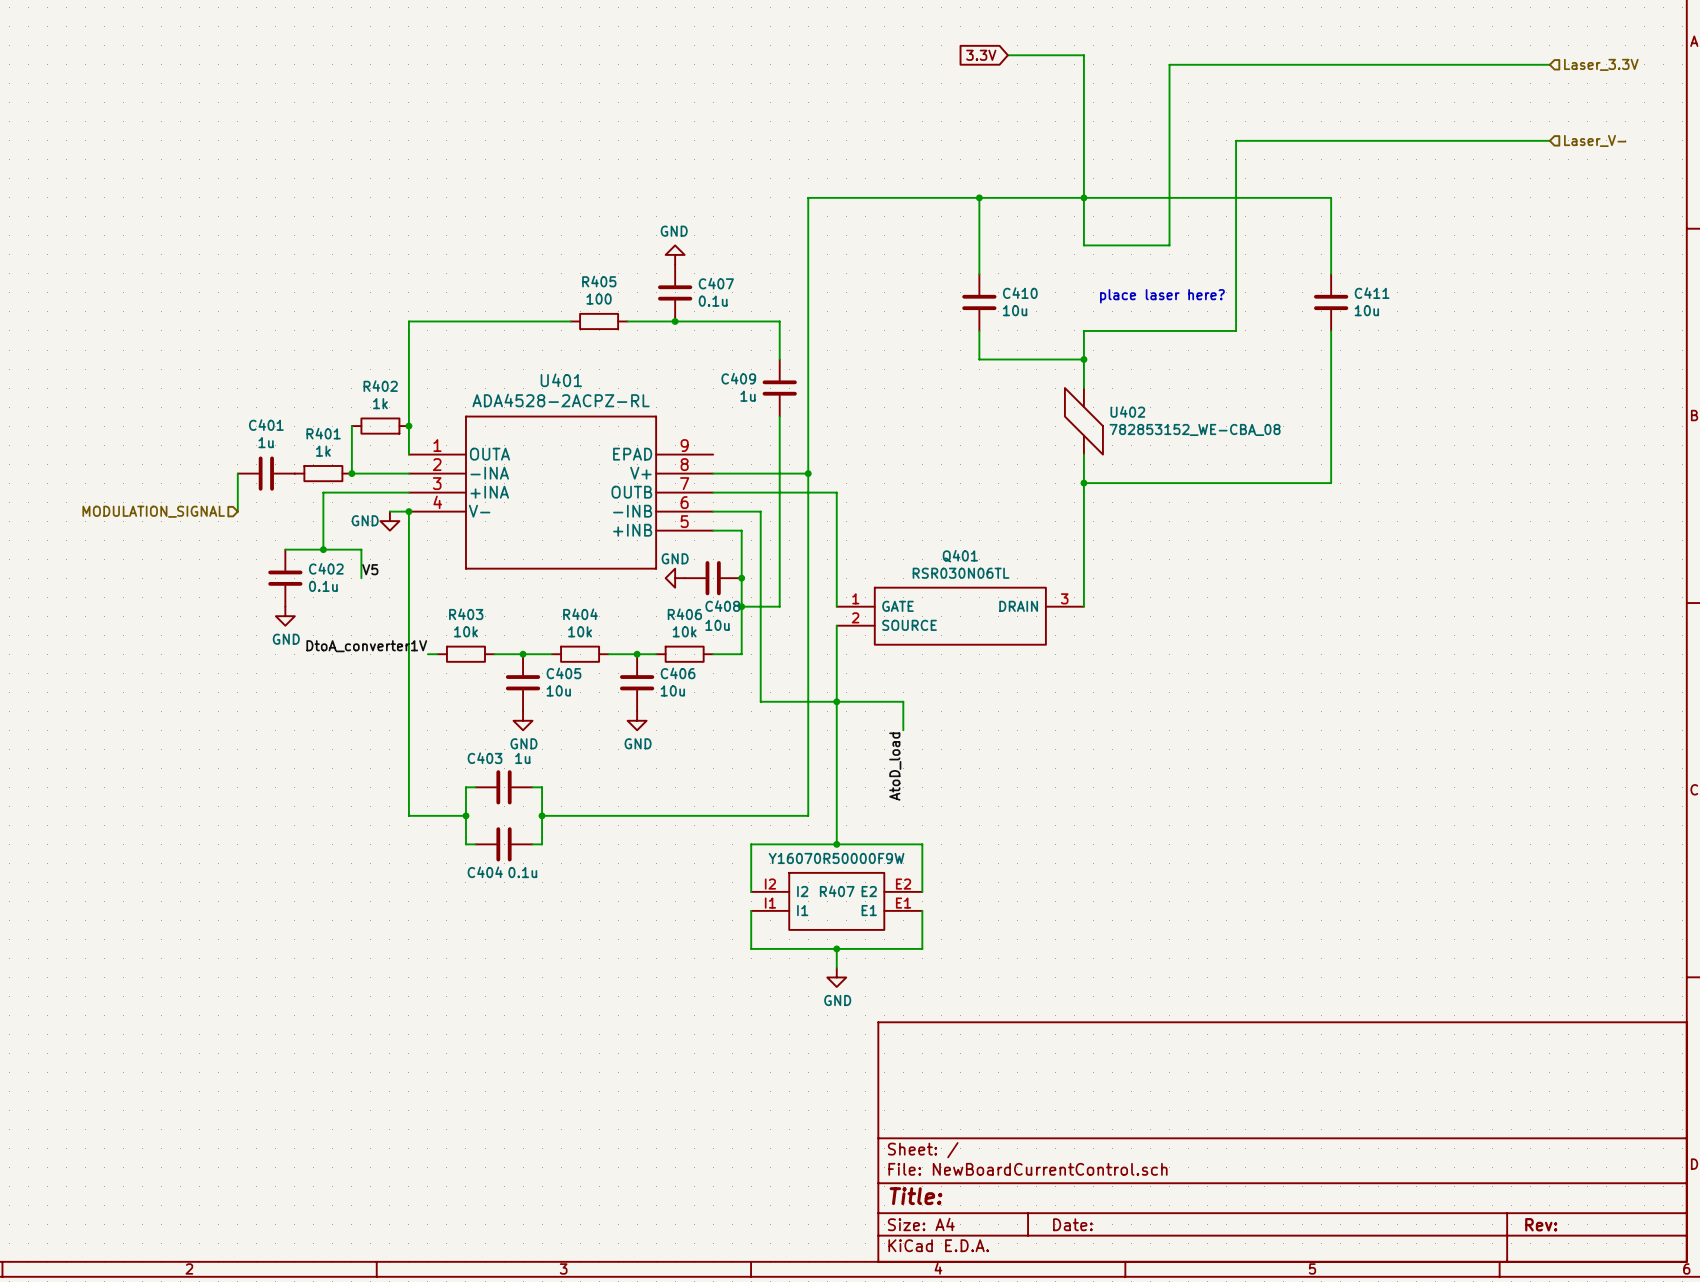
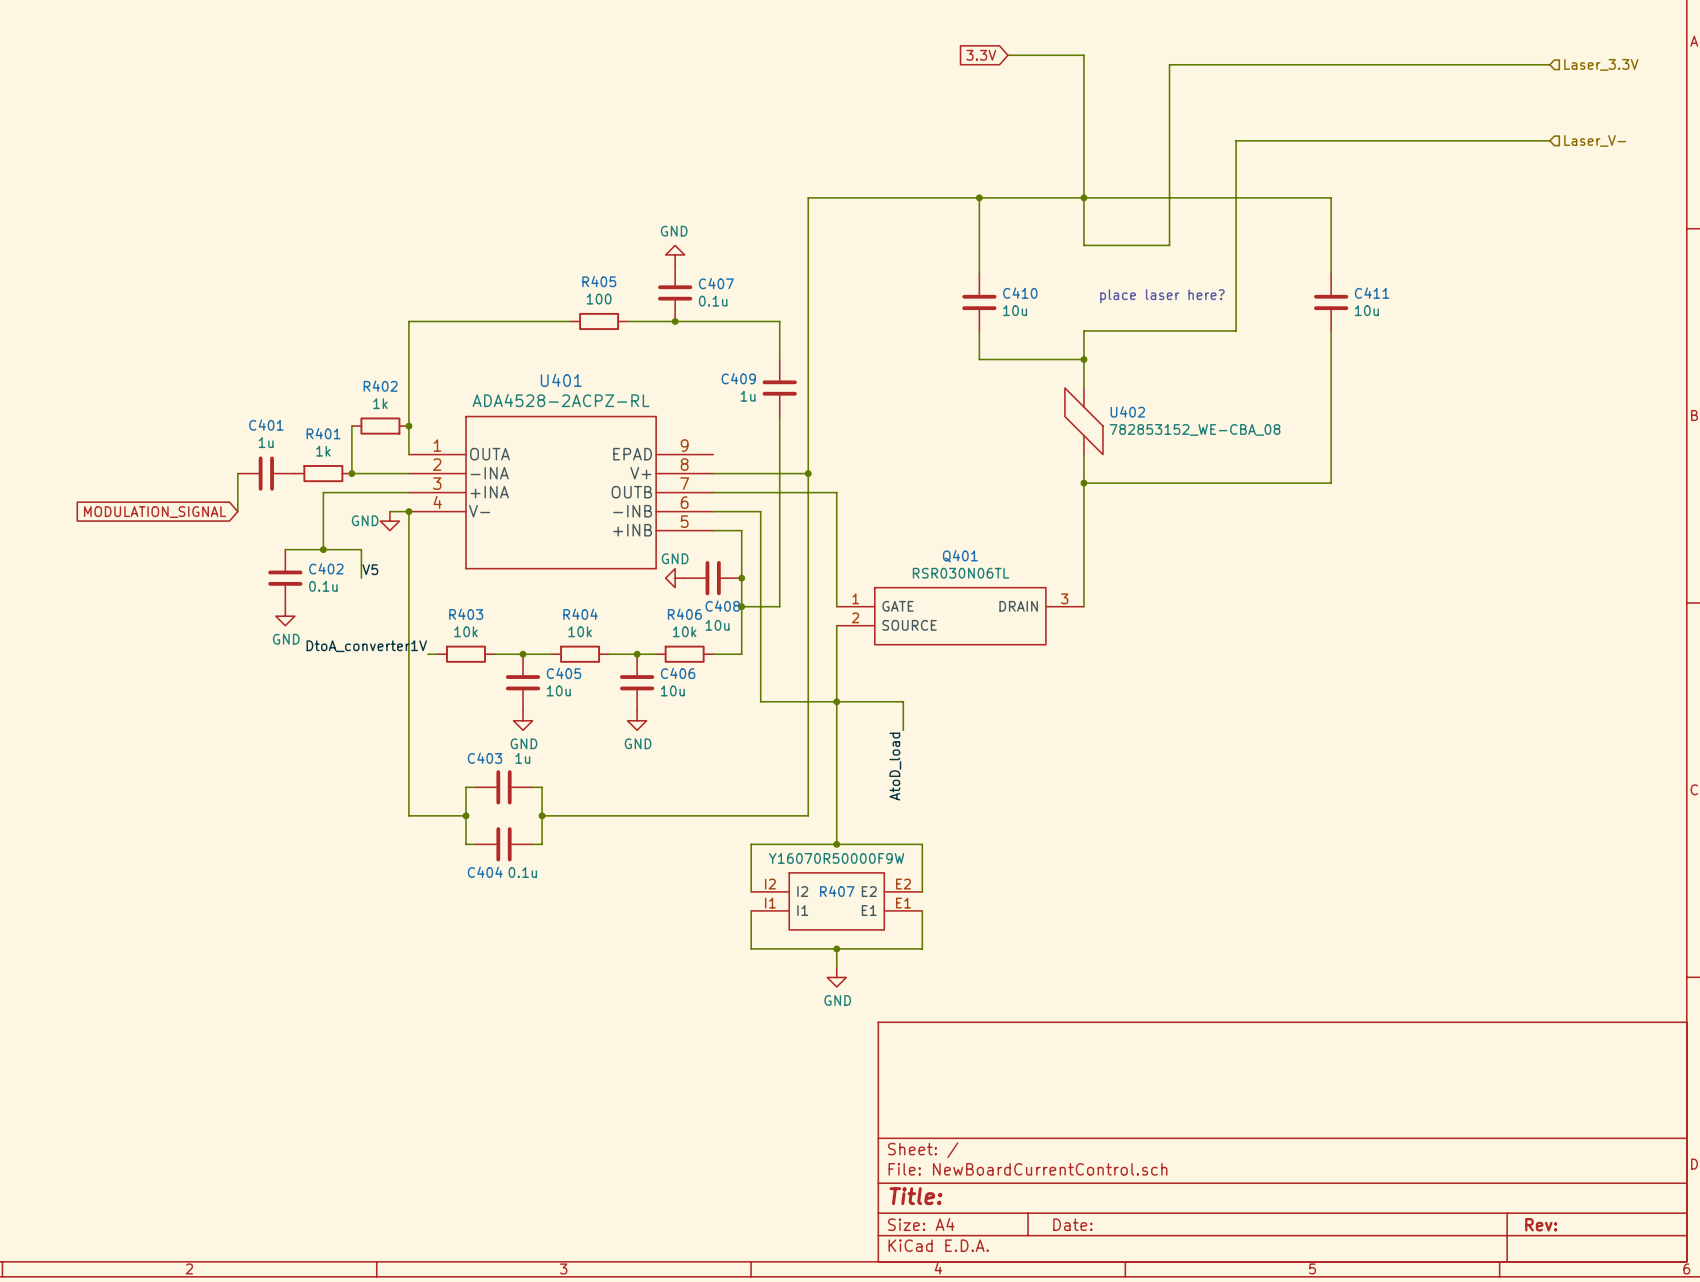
hierarchical label: MODULATION_SIGNAL (153, 511) -> none
global label: none -> MODULATION_SIGNAL (155, 512)

